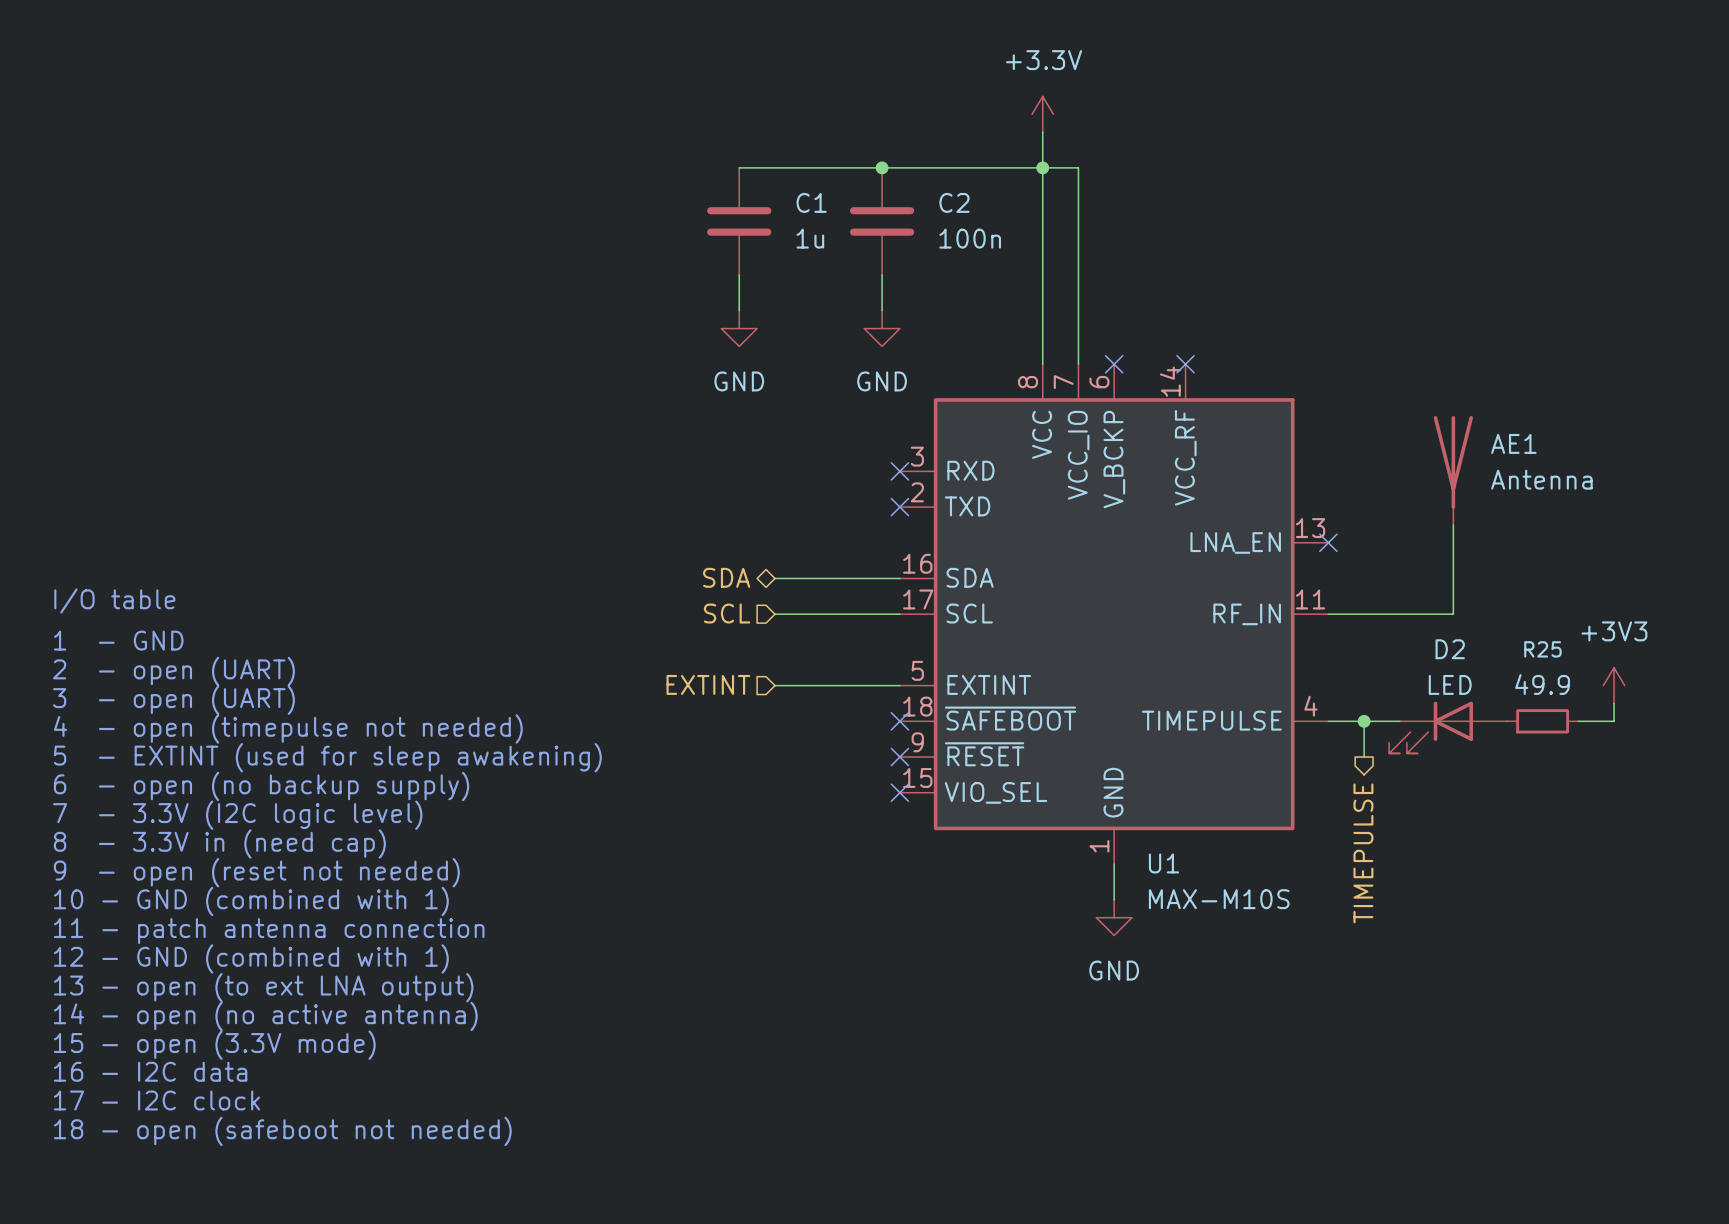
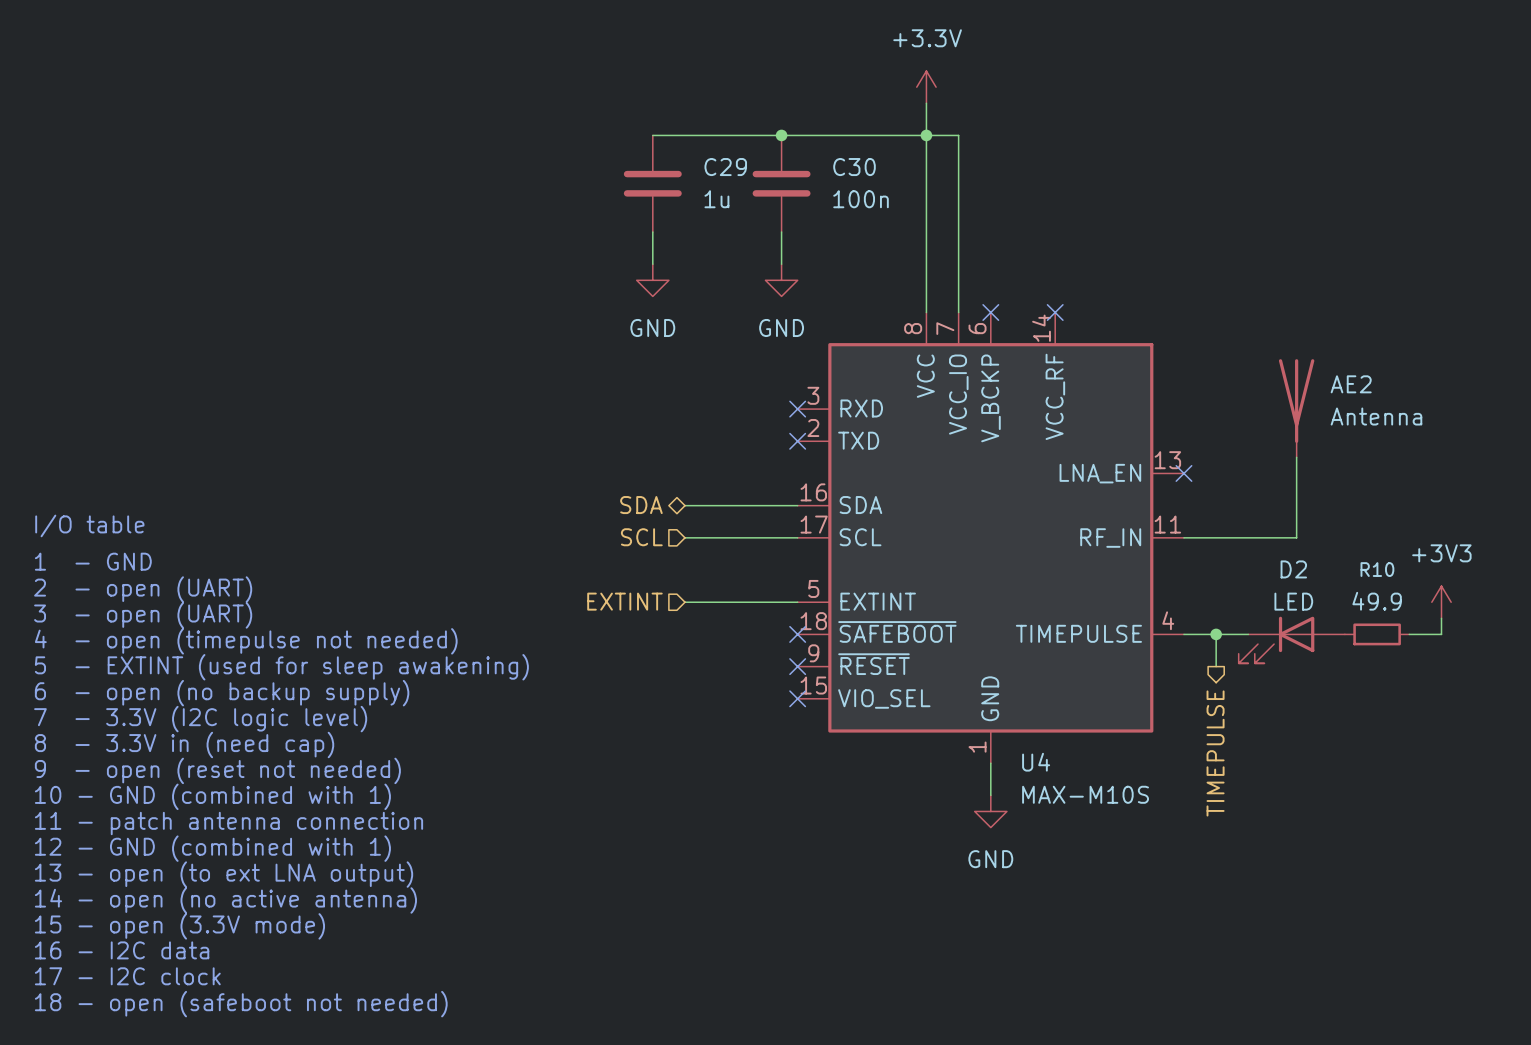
C1 name: C1 (811, 202) -> C29 (725, 167)
C2 name: C2 (954, 202) -> C30 (854, 167)
AE1 name: AE1 (1513, 443) -> AE2 (1351, 384)
R25 name: R25 (1542, 649) -> R10 (1377, 569)
U1 name: U1 (1163, 863) -> U4 (1036, 762)

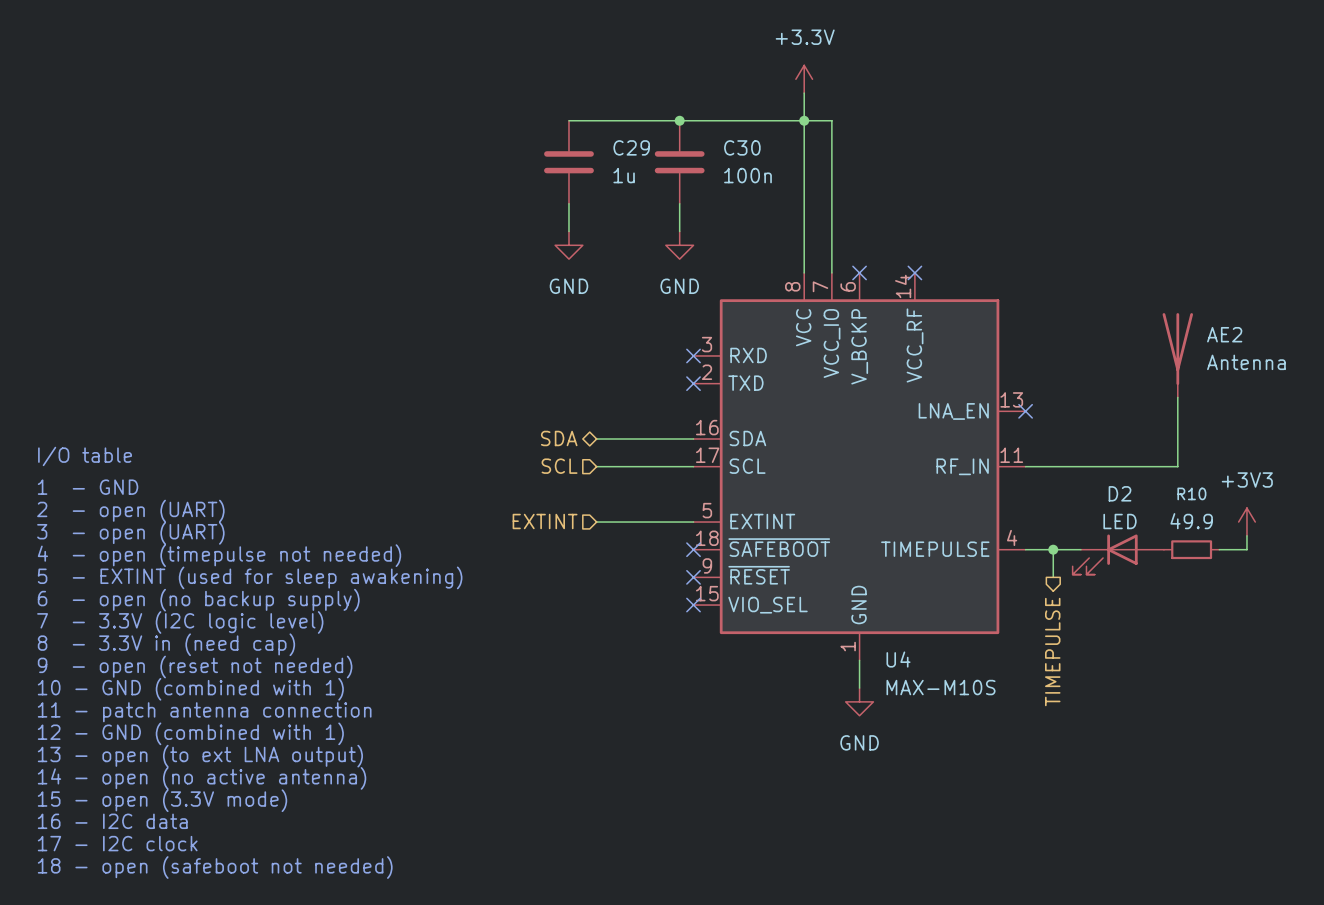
AE2 position: (1296, 408) -> (1177, 355)
wire: (1296, 457) (1296, 537) -> (1177, 397) (1177, 466) (1122, 466)

